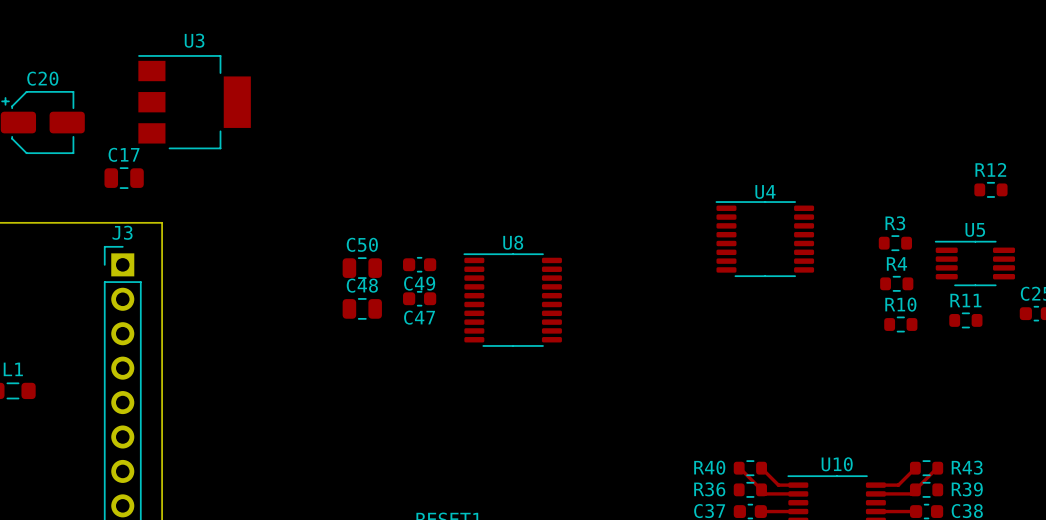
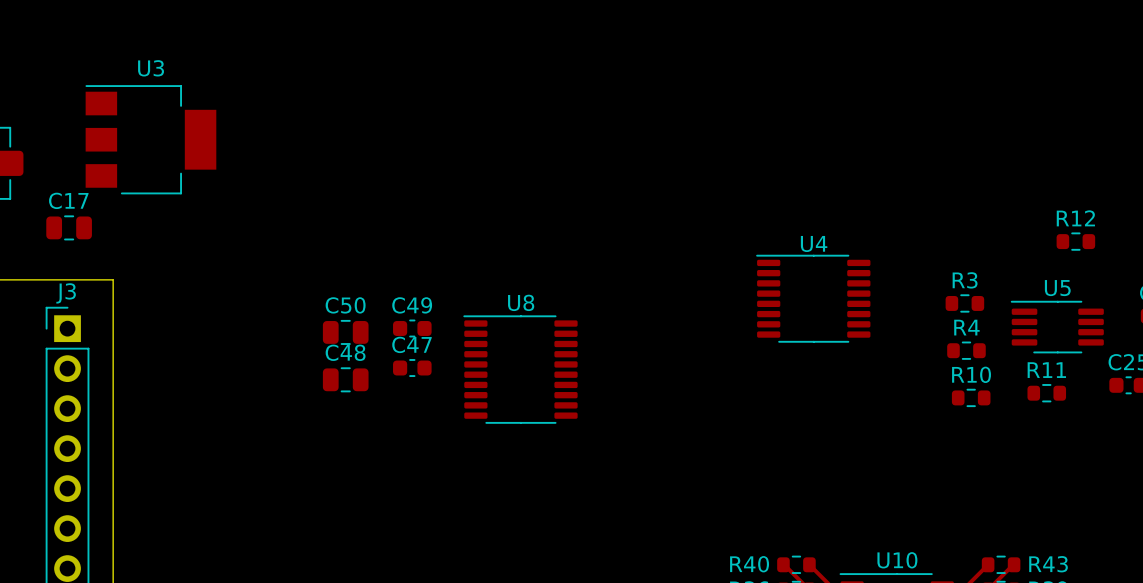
C49 name position: C49 (419, 283) -> C49 (412, 305)
C47 name position: C47 (419, 317) -> C47 (411, 344)

